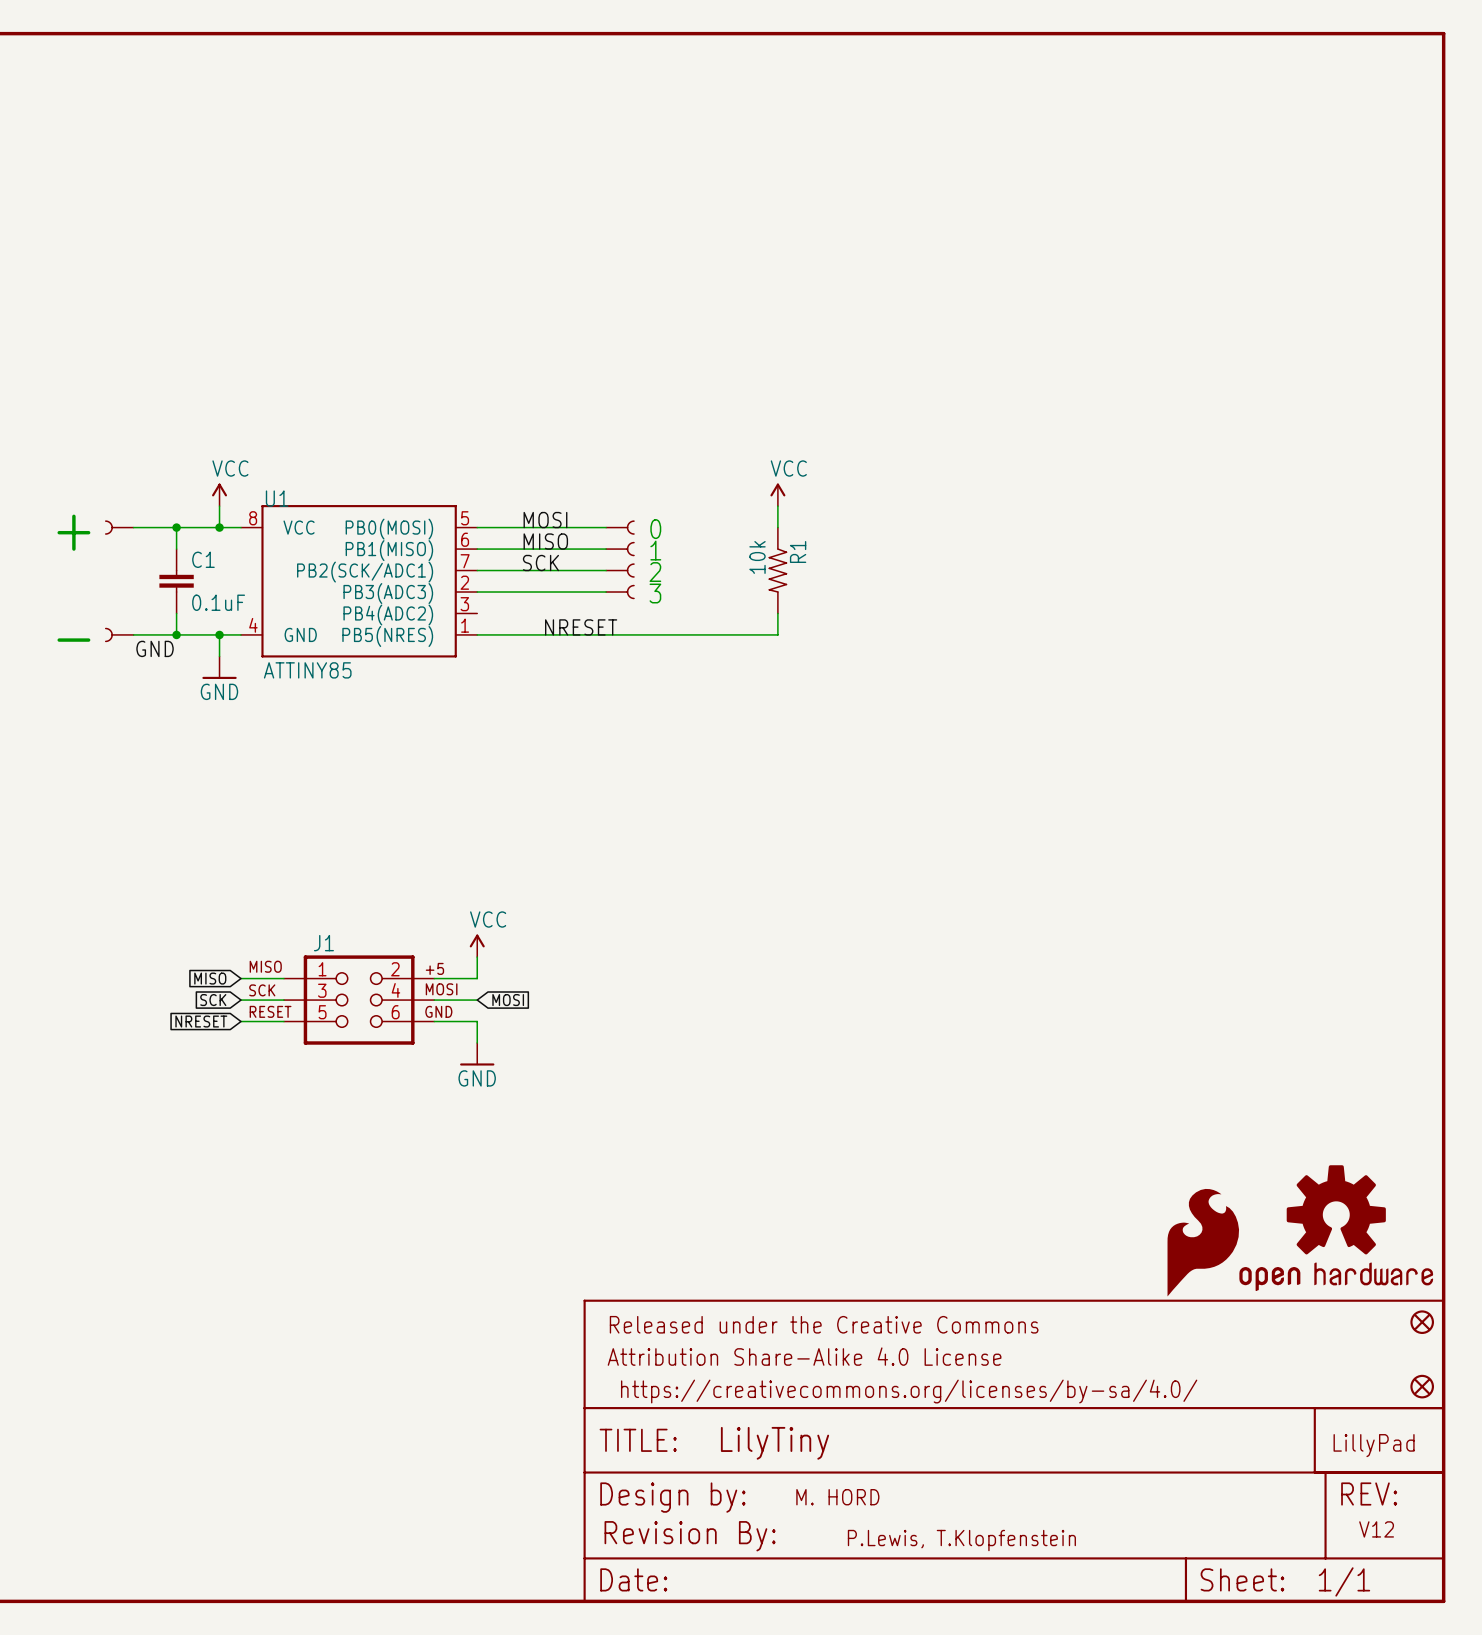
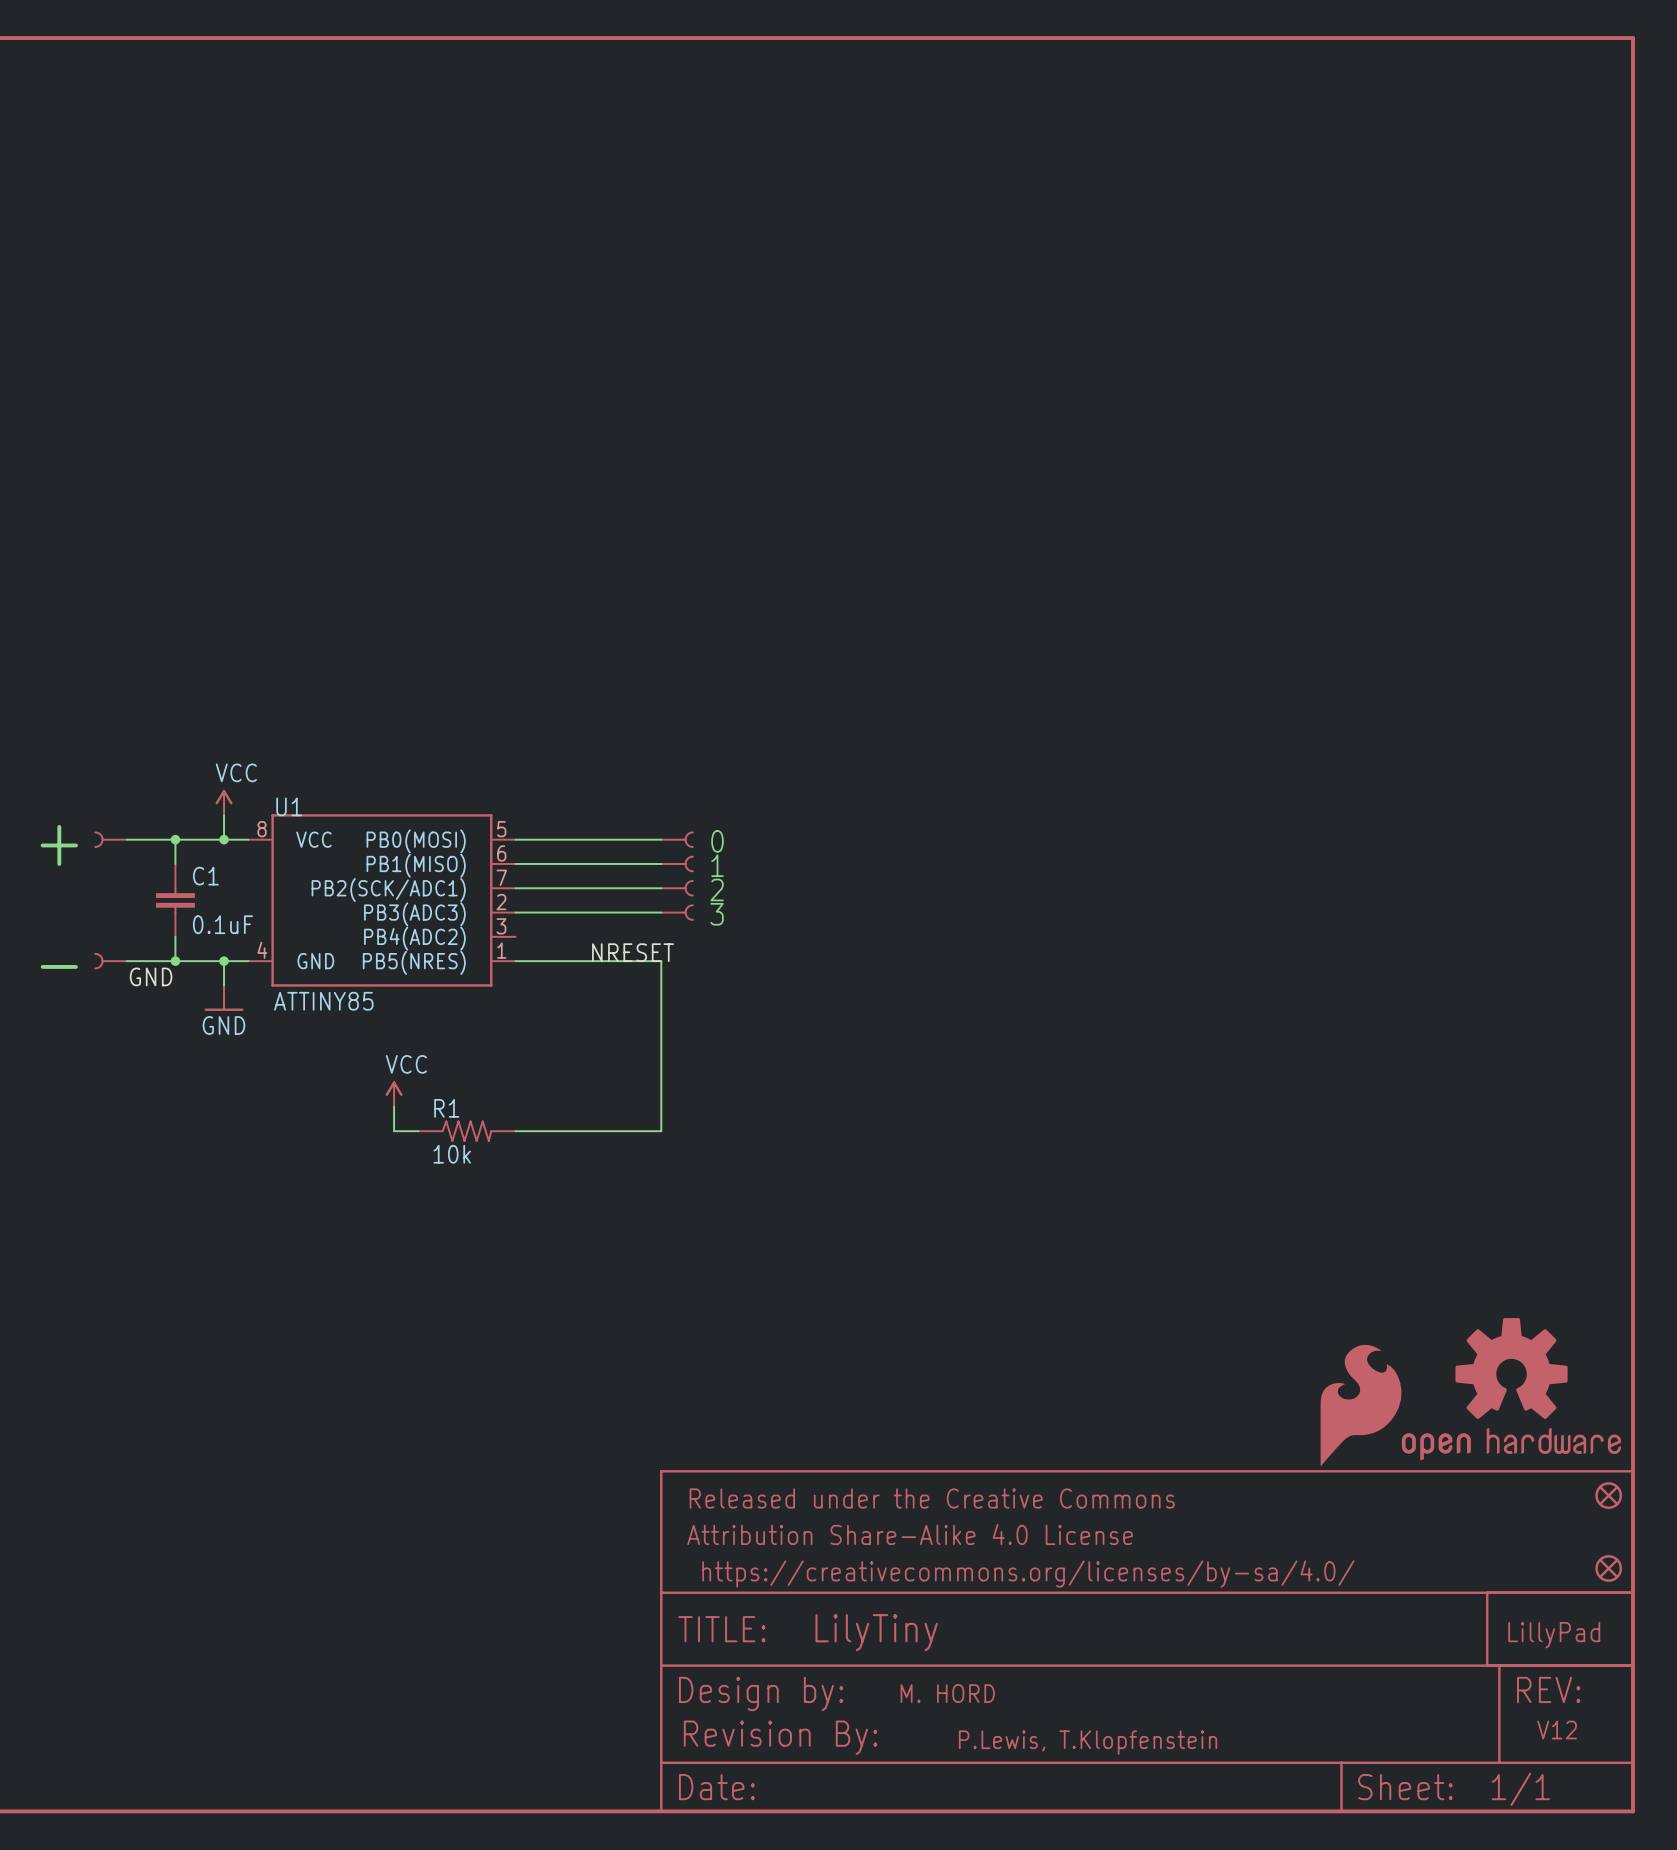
power symbol: VCC (219, 494) -> none
power symbol: VCC (777, 494) -> none
wire: (219, 506) (219, 527) -> none
wire: (777, 506) (777, 527) -> none
label: MOSI (545, 520) -> none
part: (119, 527) -> none
wire: (133, 527) (241, 527) -> none
wire: (176, 527) (176, 549) -> none
junction: (176, 527) -> none
junction: (219, 527) -> none
wire: (477, 527) (606, 527) -> none
part: (620, 527) -> none
text: 0 (655, 529) -> none
text: + (73, 532) -> none
label: MISO (545, 541) -> none
wire: (477, 549) (606, 549) -> (515, 839) (661, 839)
part: (620, 549) -> none
text: 1 (655, 550) -> none
label: SCK (540, 563) -> none
wire: (477, 570) (606, 570) -> (515, 863) (661, 863)
part: (620, 570) -> none
R1 rotation: 0° (777, 570) -> 90° counterclockwise (466, 1131)
R1 position: (777, 570) -> (466, 1131)
text: 2 (655, 572) -> none
C1 position: (176, 581) -> (175, 900)
U1 position: (359, 581) -> (381, 900)
wire: (477, 592) (606, 592) -> (515, 888) (661, 888)
part: (620, 592) -> none
text: 3 (655, 593) -> none
wire: (176, 613) (176, 634) -> (175, 839) (175, 863)
wire: (777, 613) (777, 634) (477, 634) -> none
label: NRESET (581, 627) -> none
part: (119, 634) -> none
wire: (133, 634) (241, 634) -> (126, 839) (248, 839)
junction: (176, 634) -> none
wire: (219, 634) (219, 656) -> (224, 815) (224, 839)
junction: (219, 634) -> none
text: - (73, 640) -> none
label: GND (155, 648) -> none
power symbol: GND (219, 667) -> none
power symbol: none -> VCC (224, 802)
part: none -> (111, 839)
junction: none -> (175, 839)
junction: none -> (224, 839)
part: none -> (677, 839)
text: none -> 0 (717, 841)
text: none -> + (59, 845)
part: none -> (677, 863)
text: none -> 1 (717, 865)
part: none -> (677, 888)
text: none -> 2 (717, 889)
wire: none -> (515, 912) (661, 912)
part: none -> (677, 912)
text: none -> 3 (717, 914)
wire: none -> (175, 936) (175, 961)
label: none -> NRESET (633, 952)
part: none -> (111, 961)
wire: none -> (126, 961) (248, 961)
junction: none -> (175, 961)
wire: none -> (224, 961) (224, 985)
junction: none -> (224, 961)
wire: none -> (515, 961) (661, 961) (661, 1131) (539, 1131)
text: none -> - (59, 966)
label: none -> GND (151, 976)
power symbol: none -> GND (224, 998)
power symbol position: VCC (477, 945) -> VCC (394, 1094)
wire: (477, 957) (477, 978) (434, 978) -> none
global label: MISO (210, 978) -> none
wire: (241, 978) (283, 978) -> none
wire: none -> (394, 1106) (394, 1131) (418, 1131)
global label: SCK (213, 1000) -> none
wire: (241, 1000) (283, 1000) -> none
J1: (359, 1000) -> none
global label: MOSI (508, 1000) -> none
global label: NRESET (201, 1021) -> none
wire: (241, 1021) (283, 1021) -> none
wire: (434, 1021) (477, 1021) (477, 1043) -> none
power symbol: GND (477, 1054) -> none

